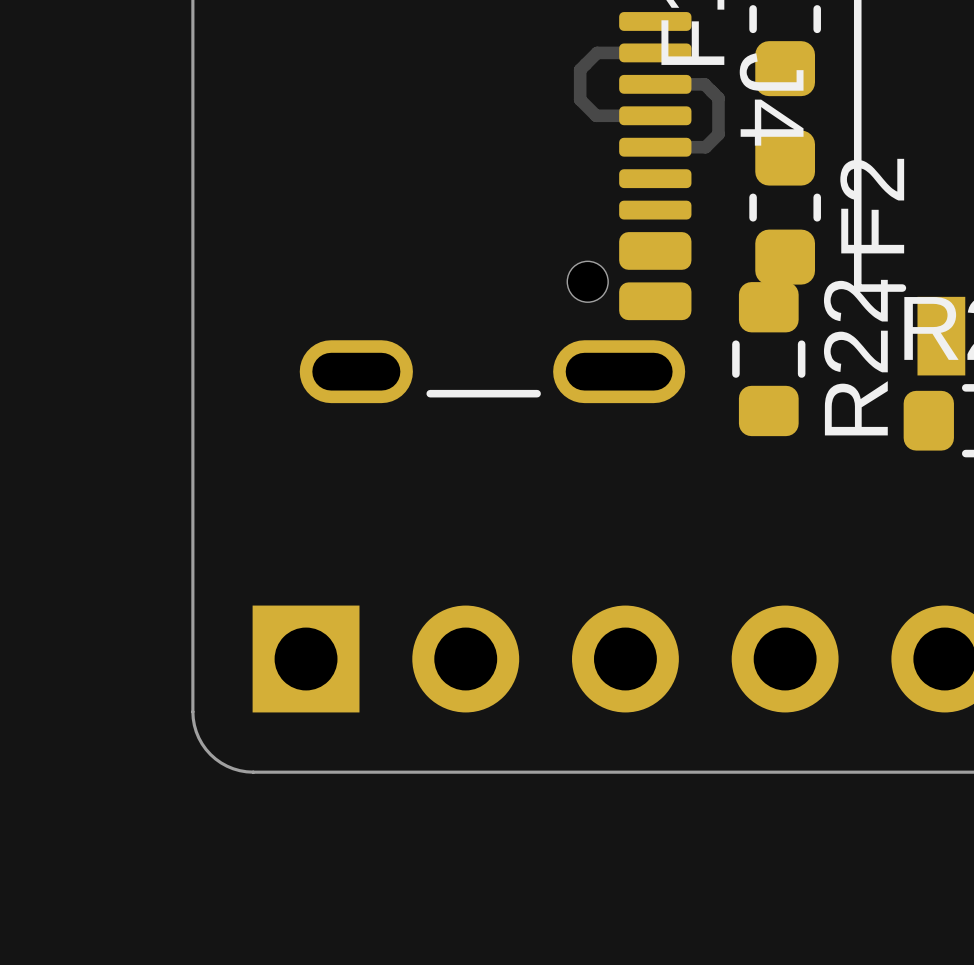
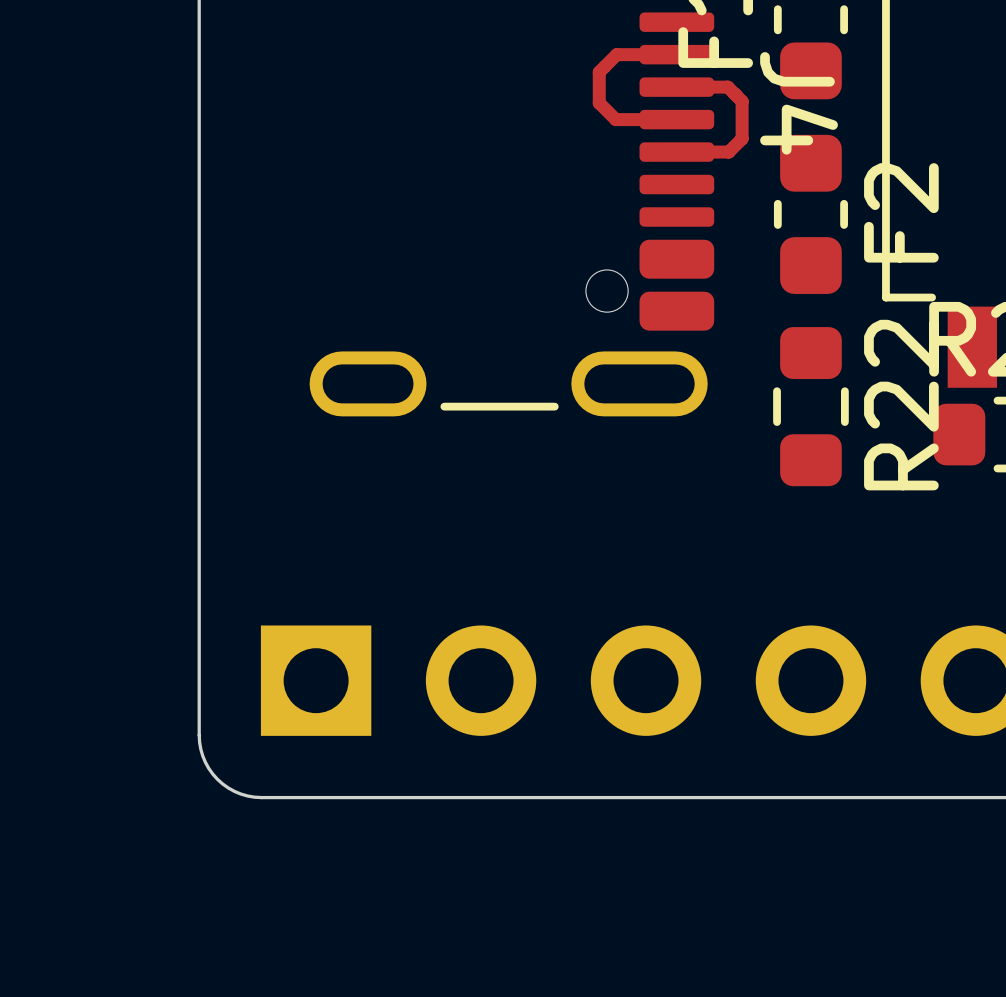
R22 position: (768, 359) -> (810, 406)

